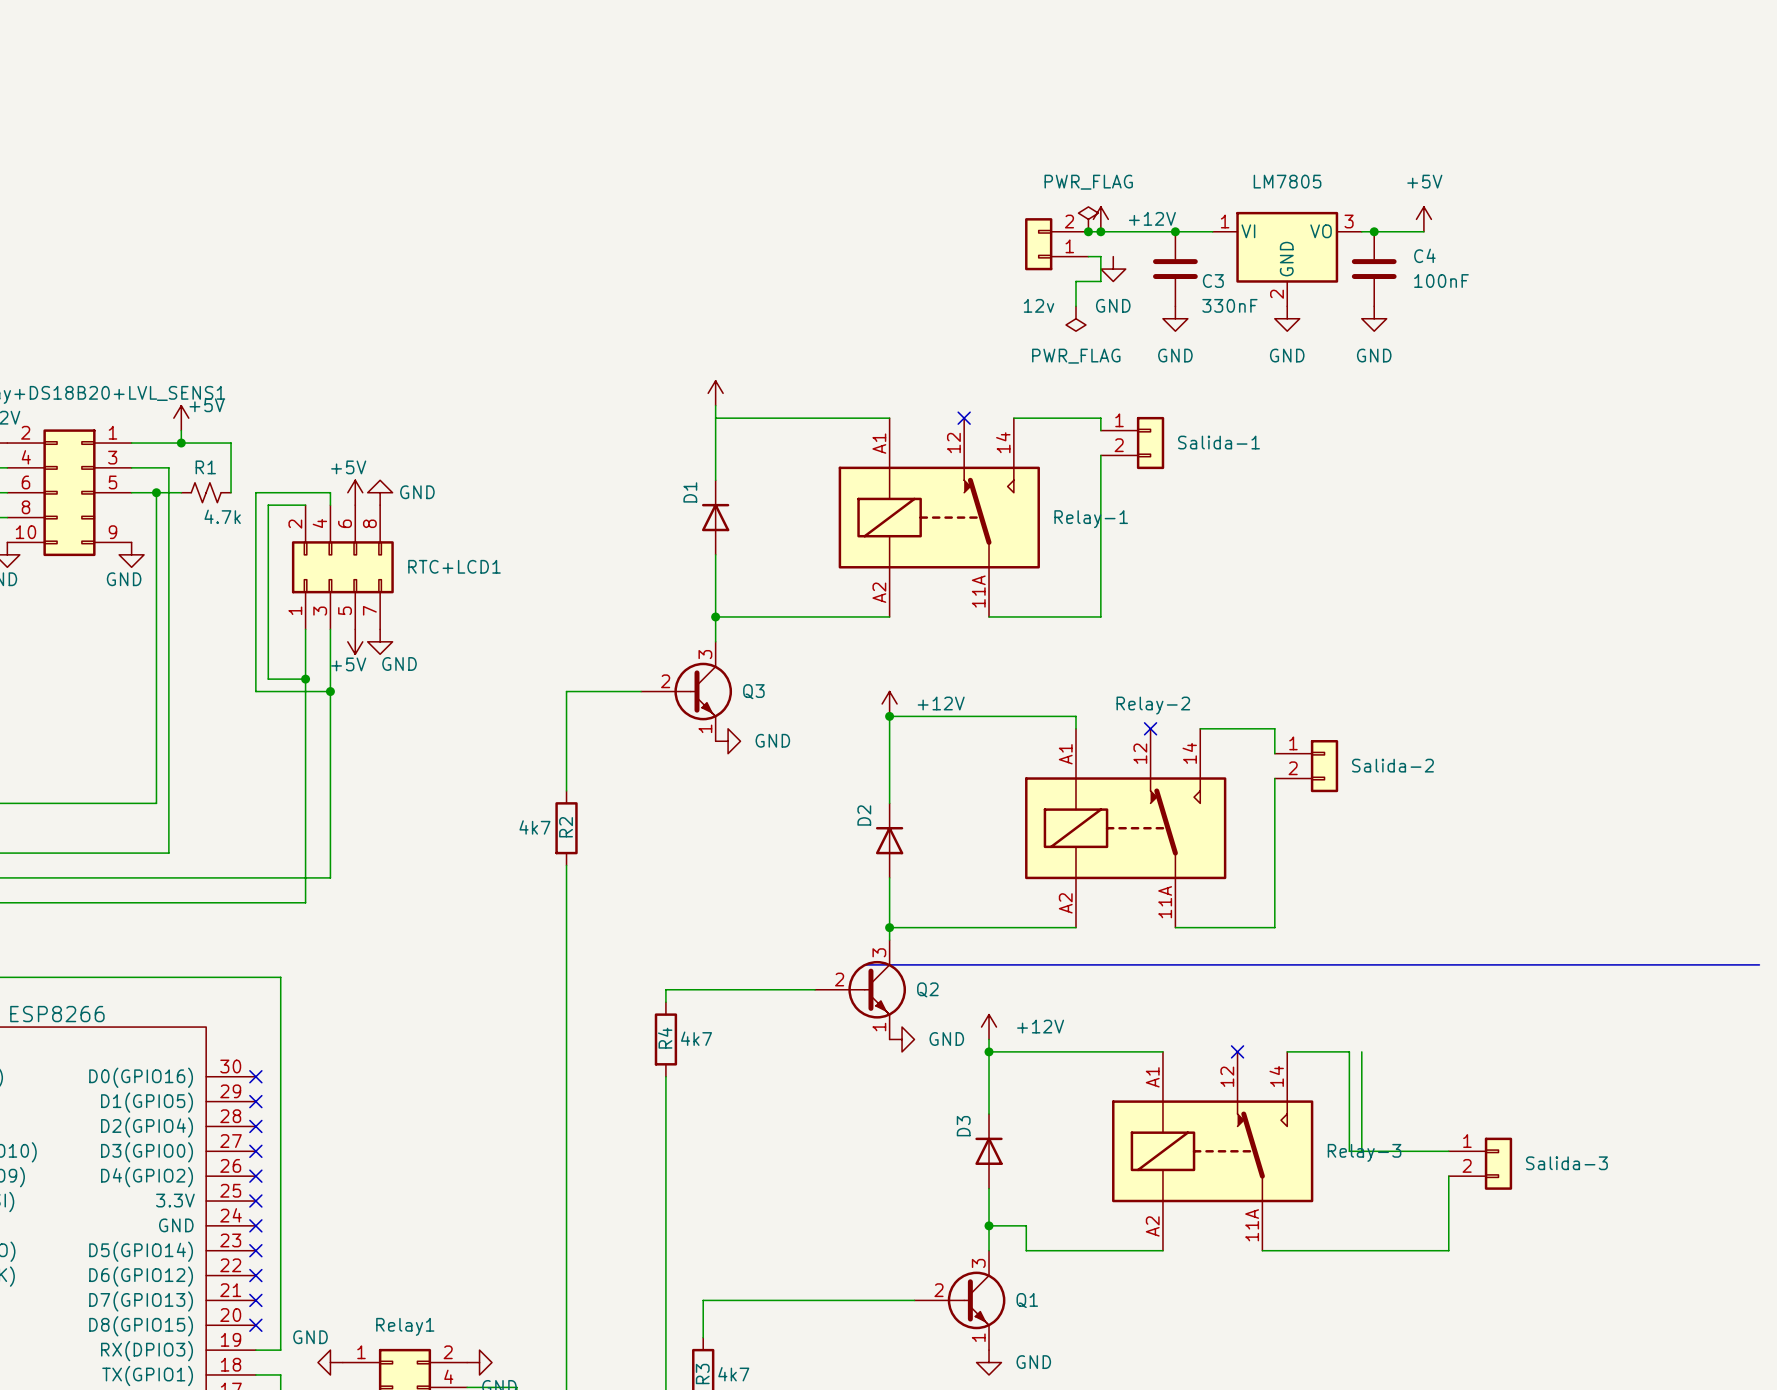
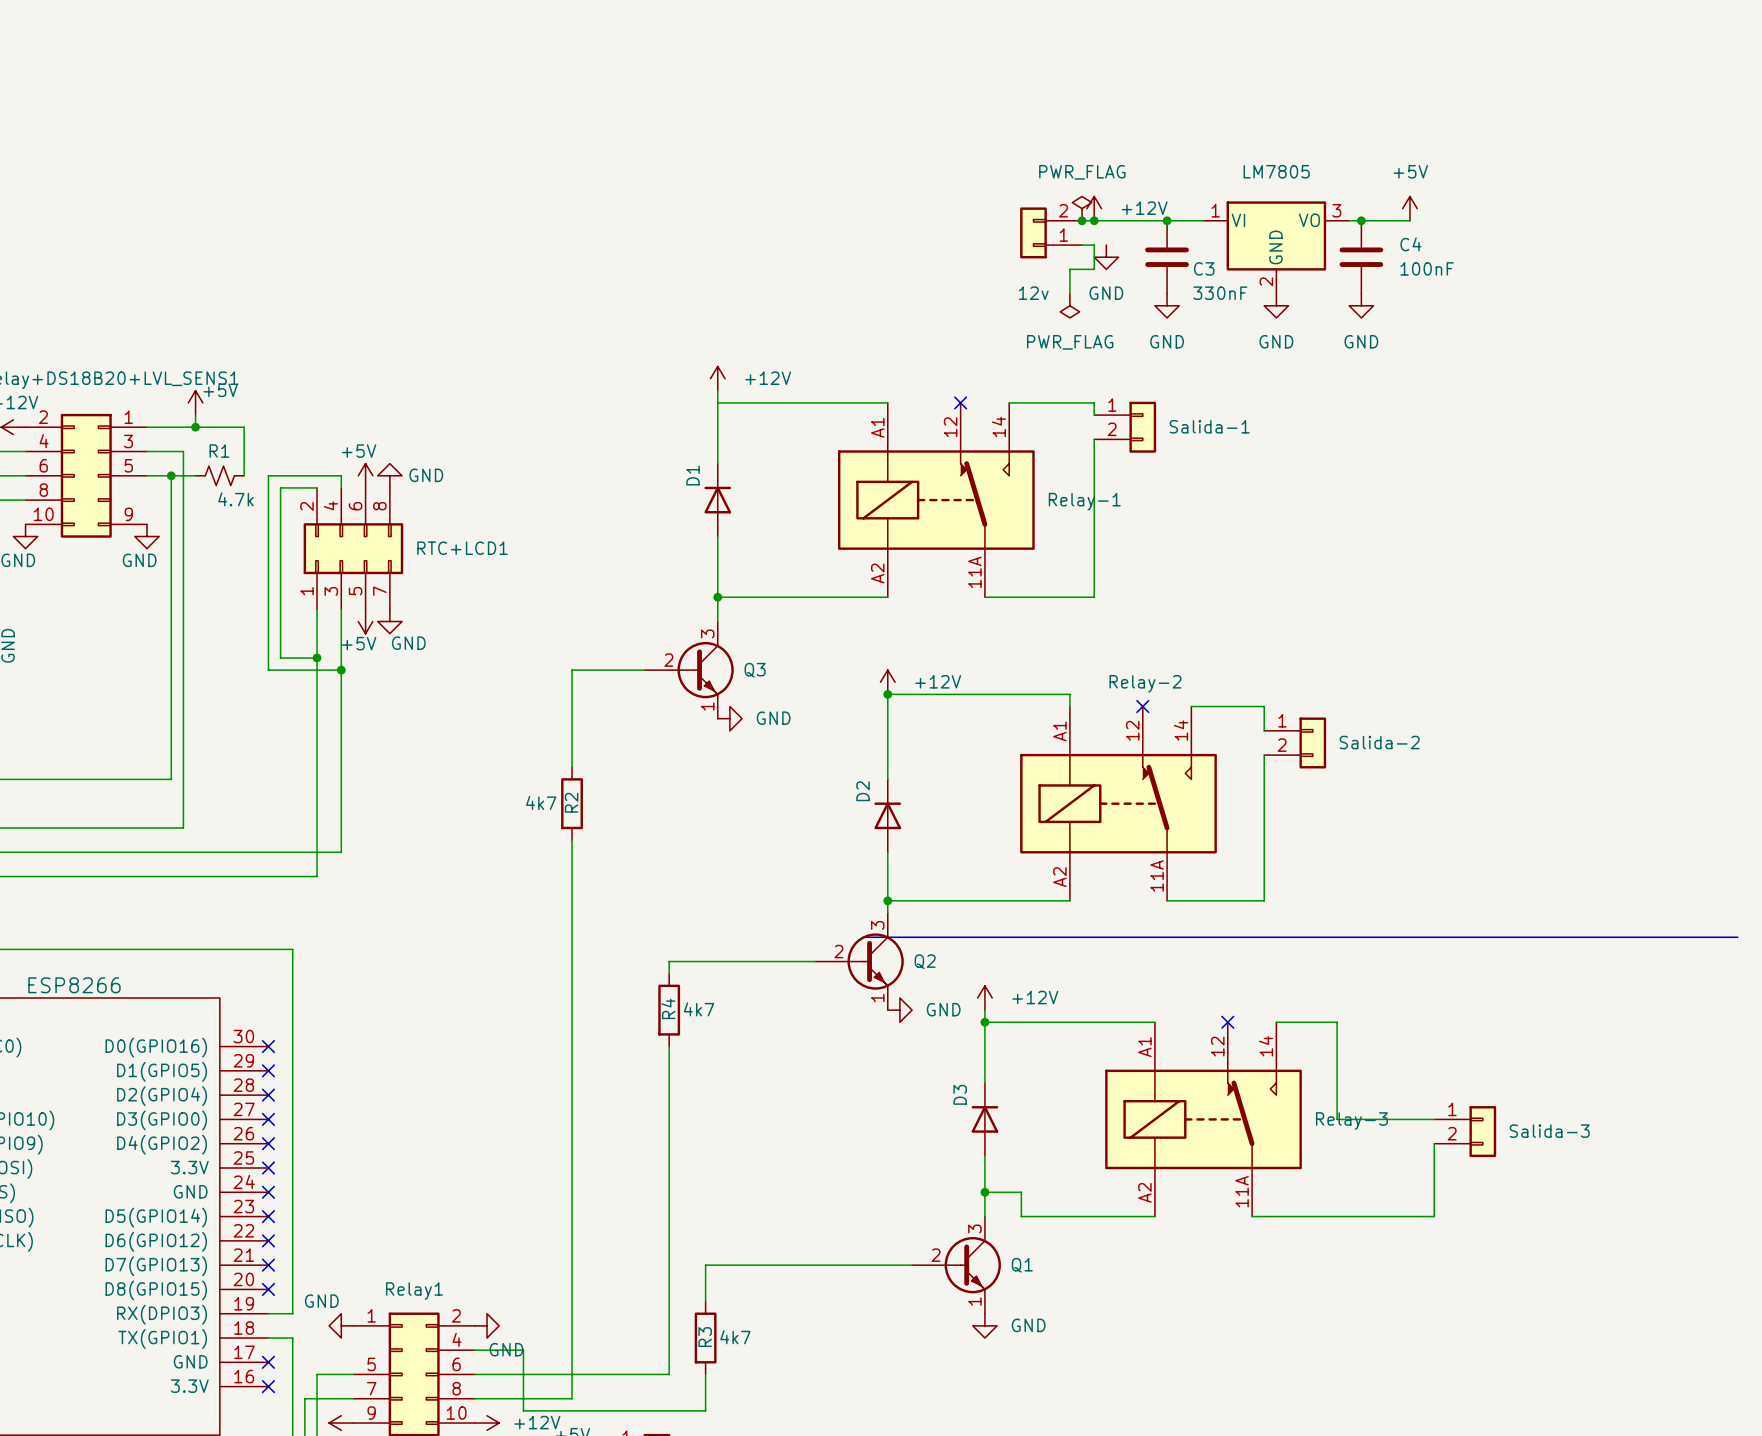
power symbol text: none -> +12V (768, 378)
wire: (1361, 1051) (1361, 1151) -> none

